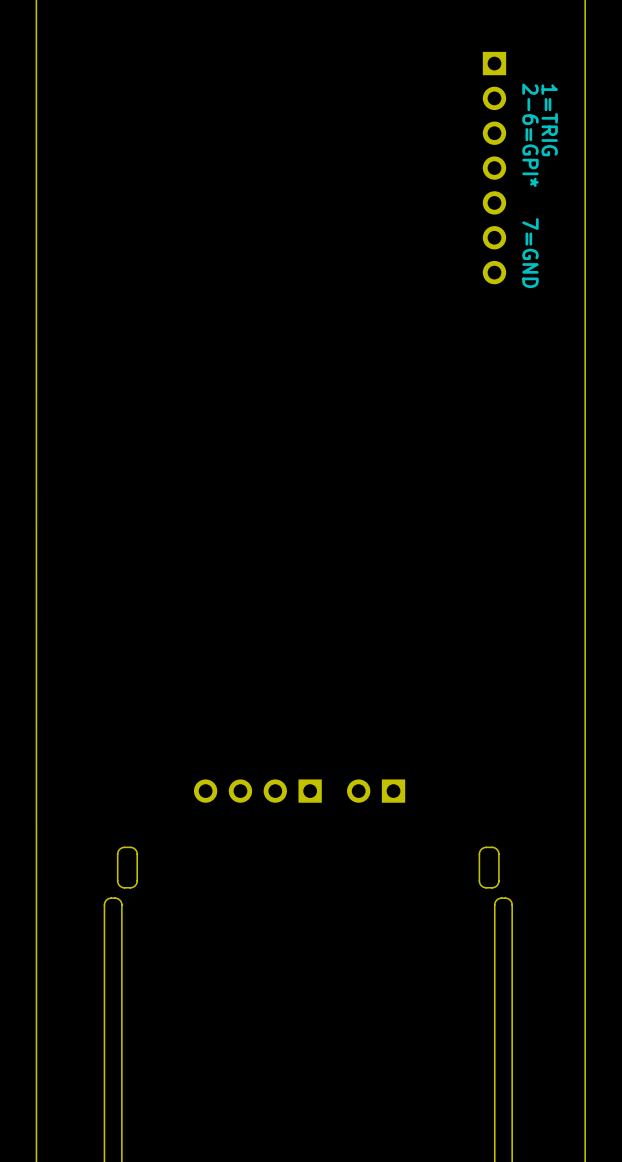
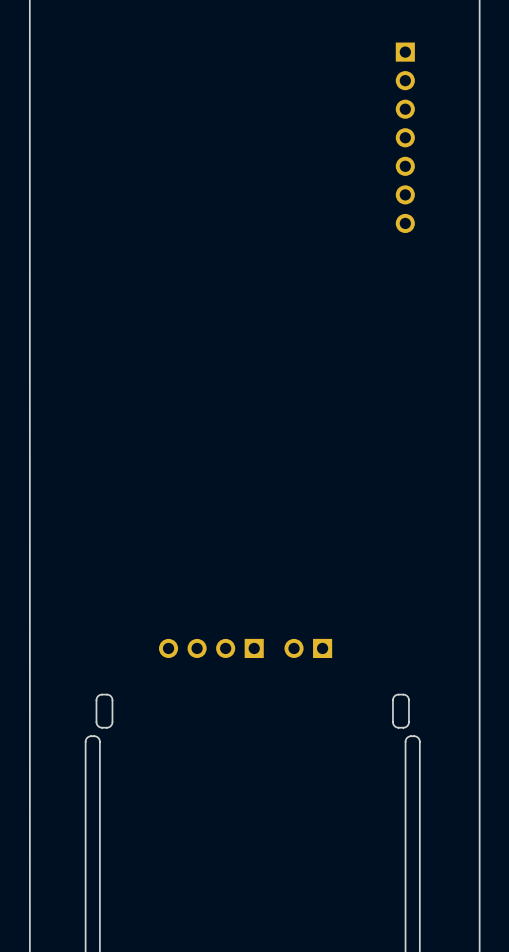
text: 1=TRIG (549, 120) -> none
text: 2-6=GPI* (530, 135) -> none
text: 7=GND (530, 253) -> none

